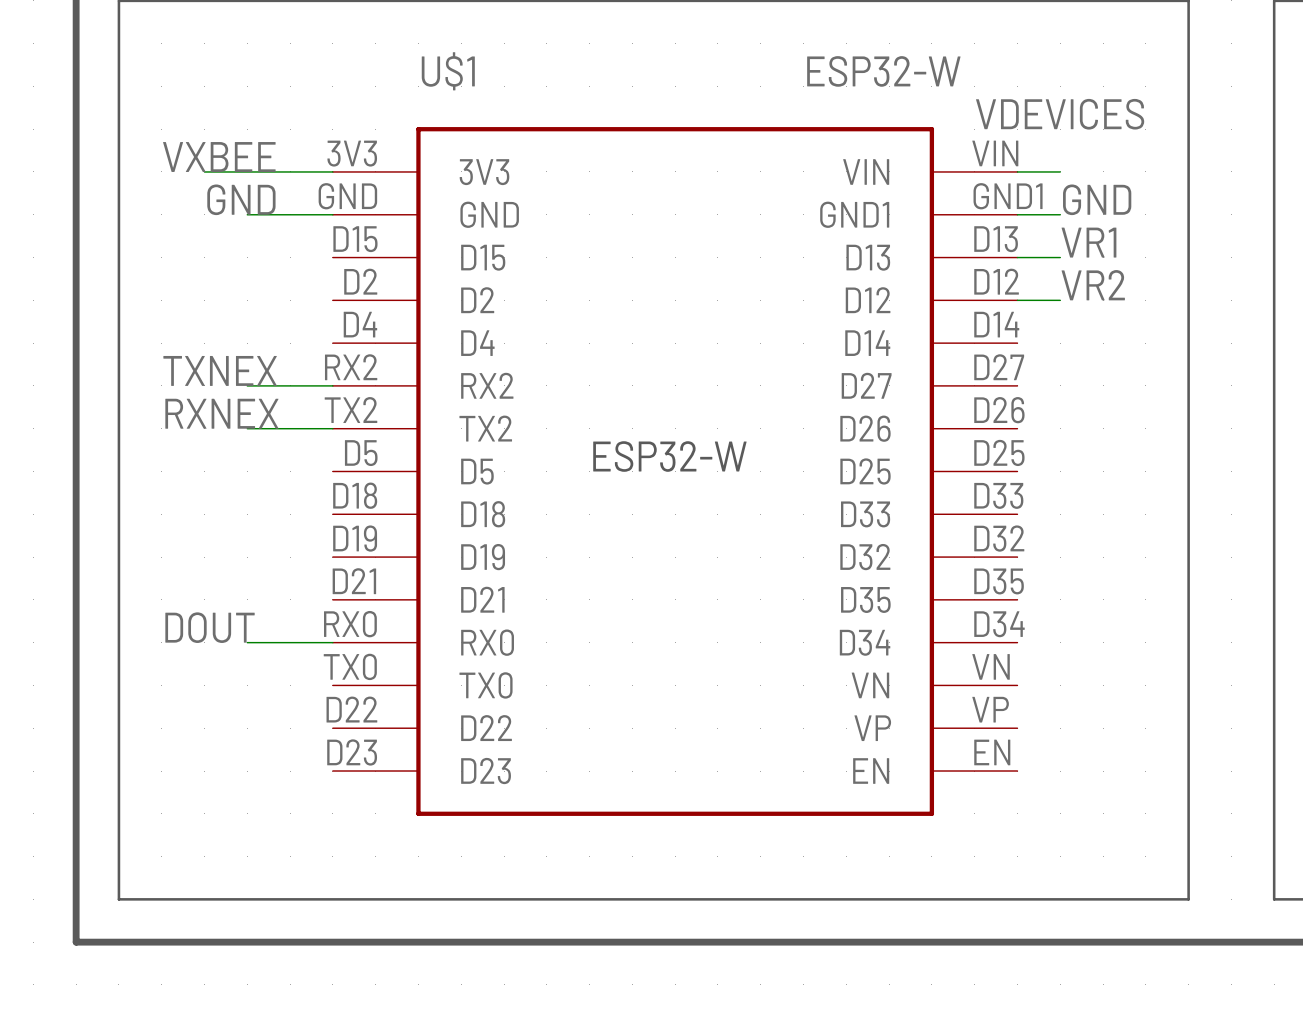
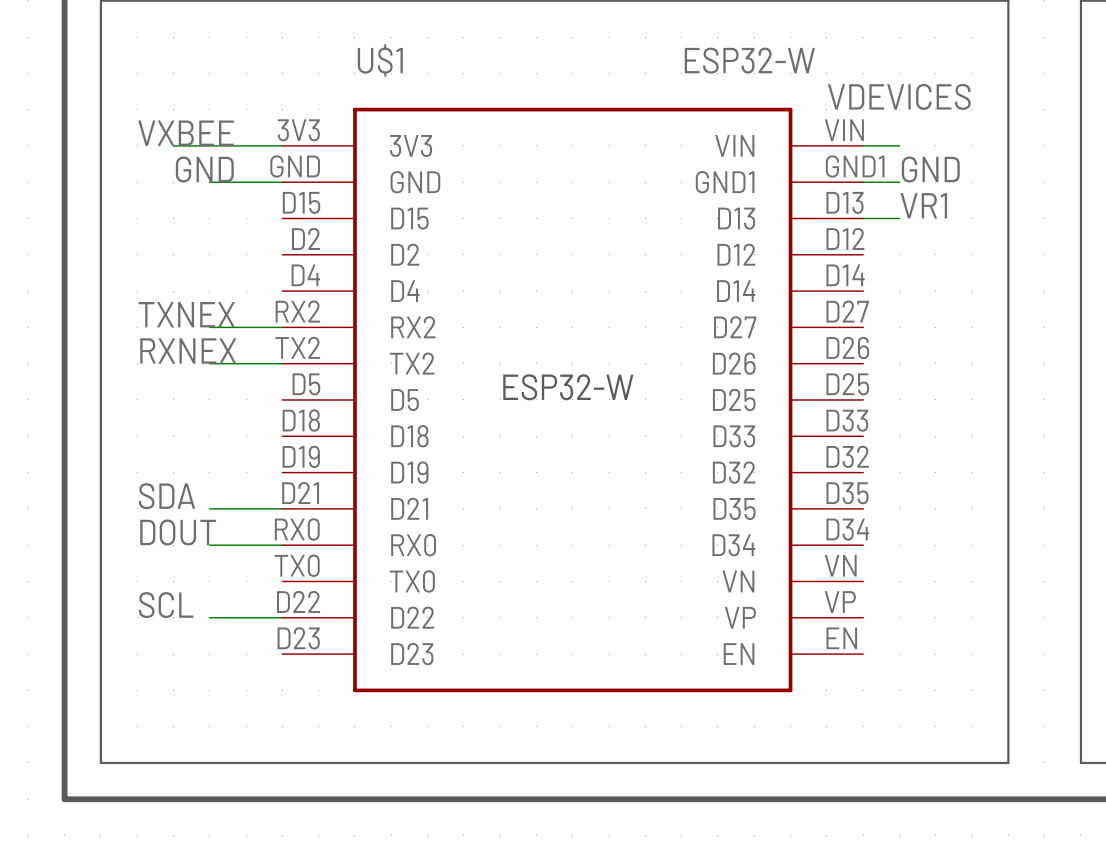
label: VR2 (1093, 285) -> none
wire: (1017, 300) (1060, 300) -> none
label: none -> SDA (167, 496)
wire: none -> (209, 508) (282, 508)
label: none -> SCL (166, 605)
wire: none -> (209, 617) (282, 617)

